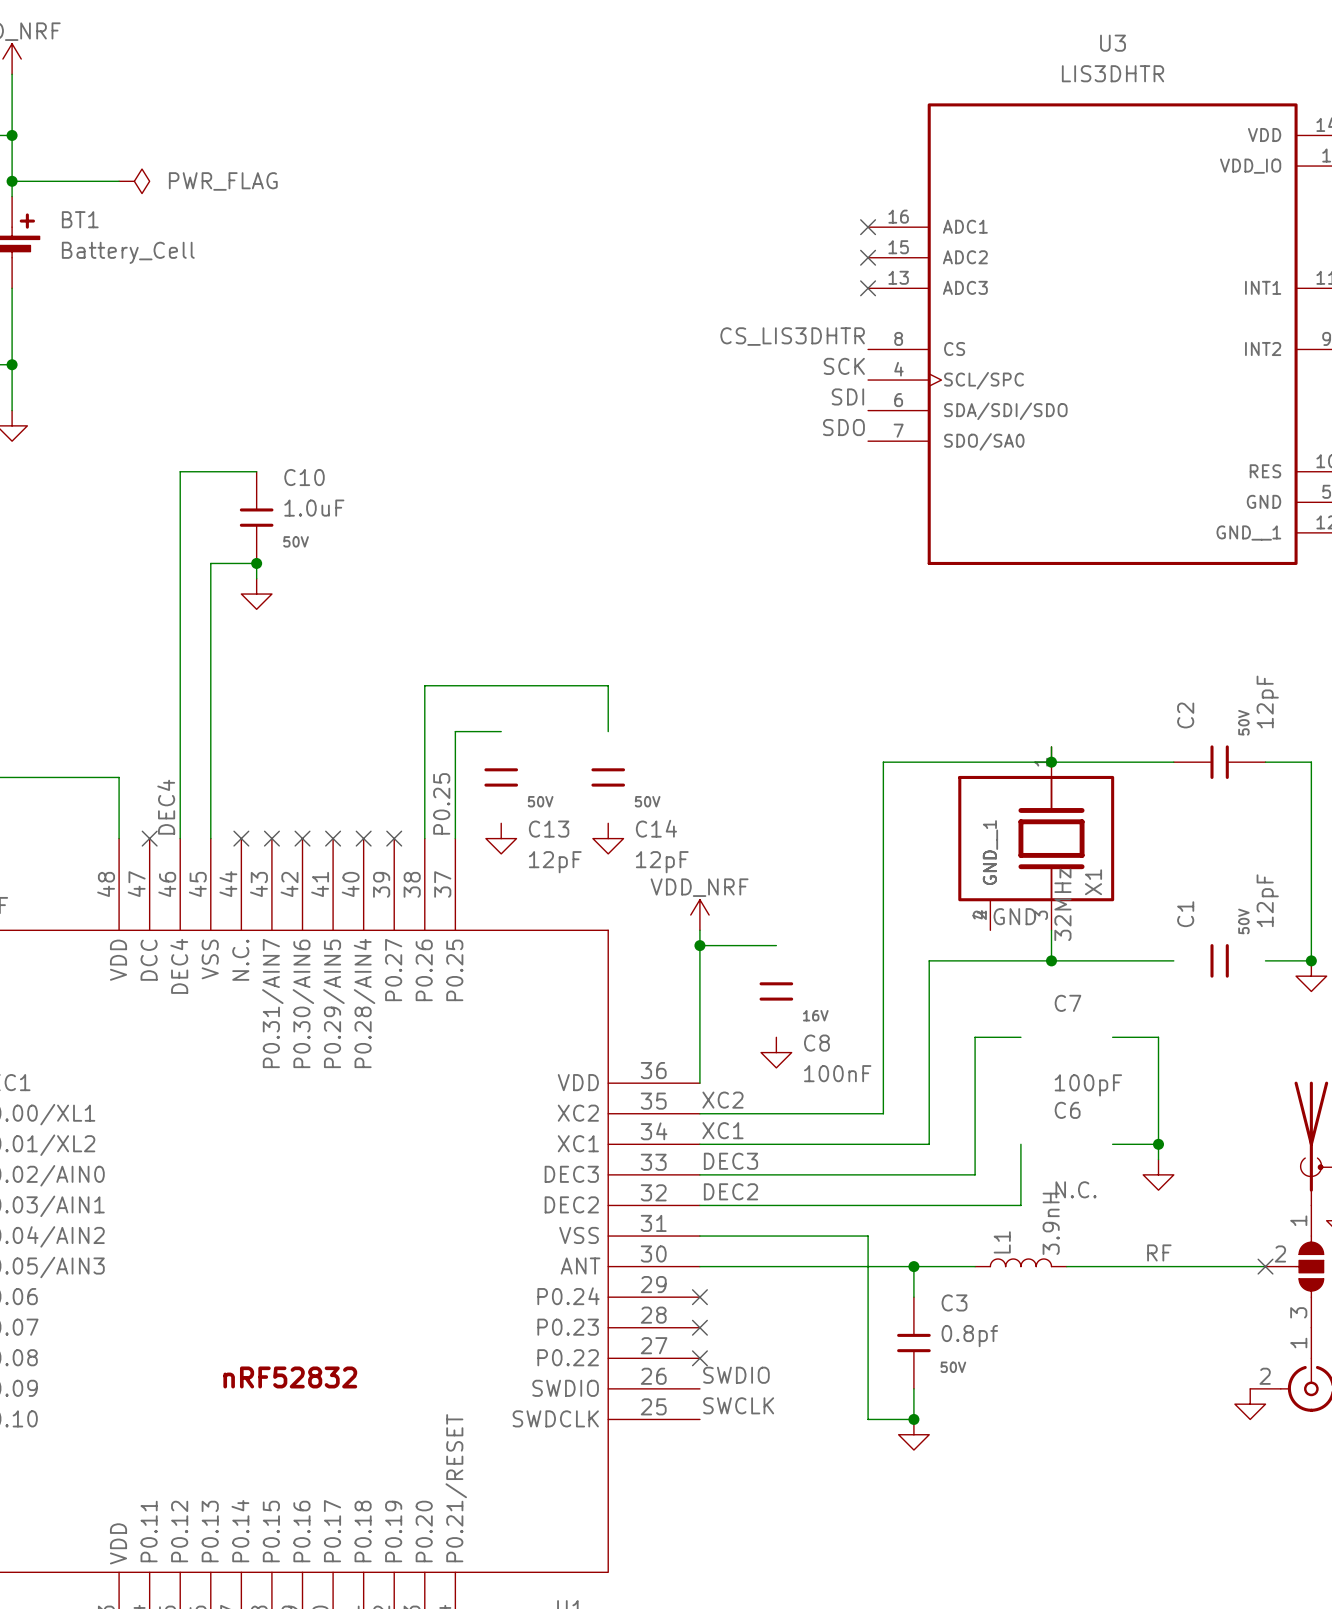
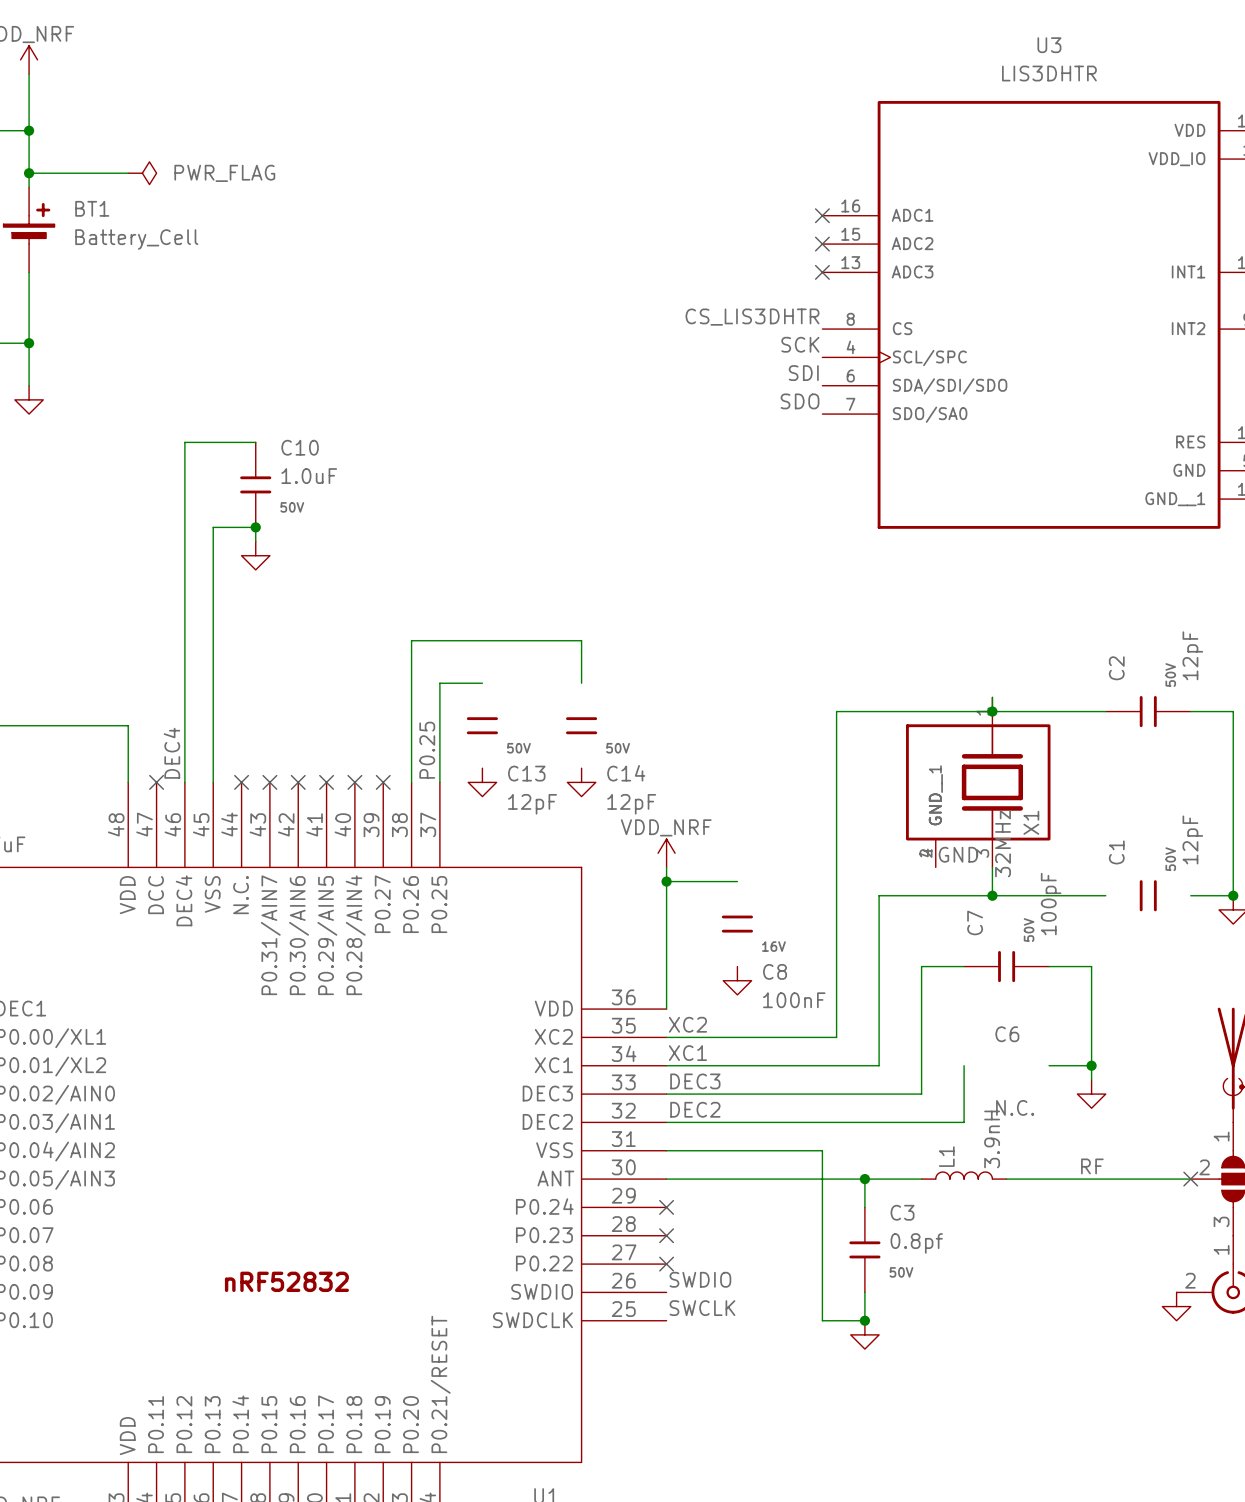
C7 symbol: [1054, 994, 1123, 1097] -> [964, 950, 1050, 983]
C7 text: none -> 50V (1029, 930)
C7 value position: 100pF (1088, 1085) -> 100pF (1051, 904)

